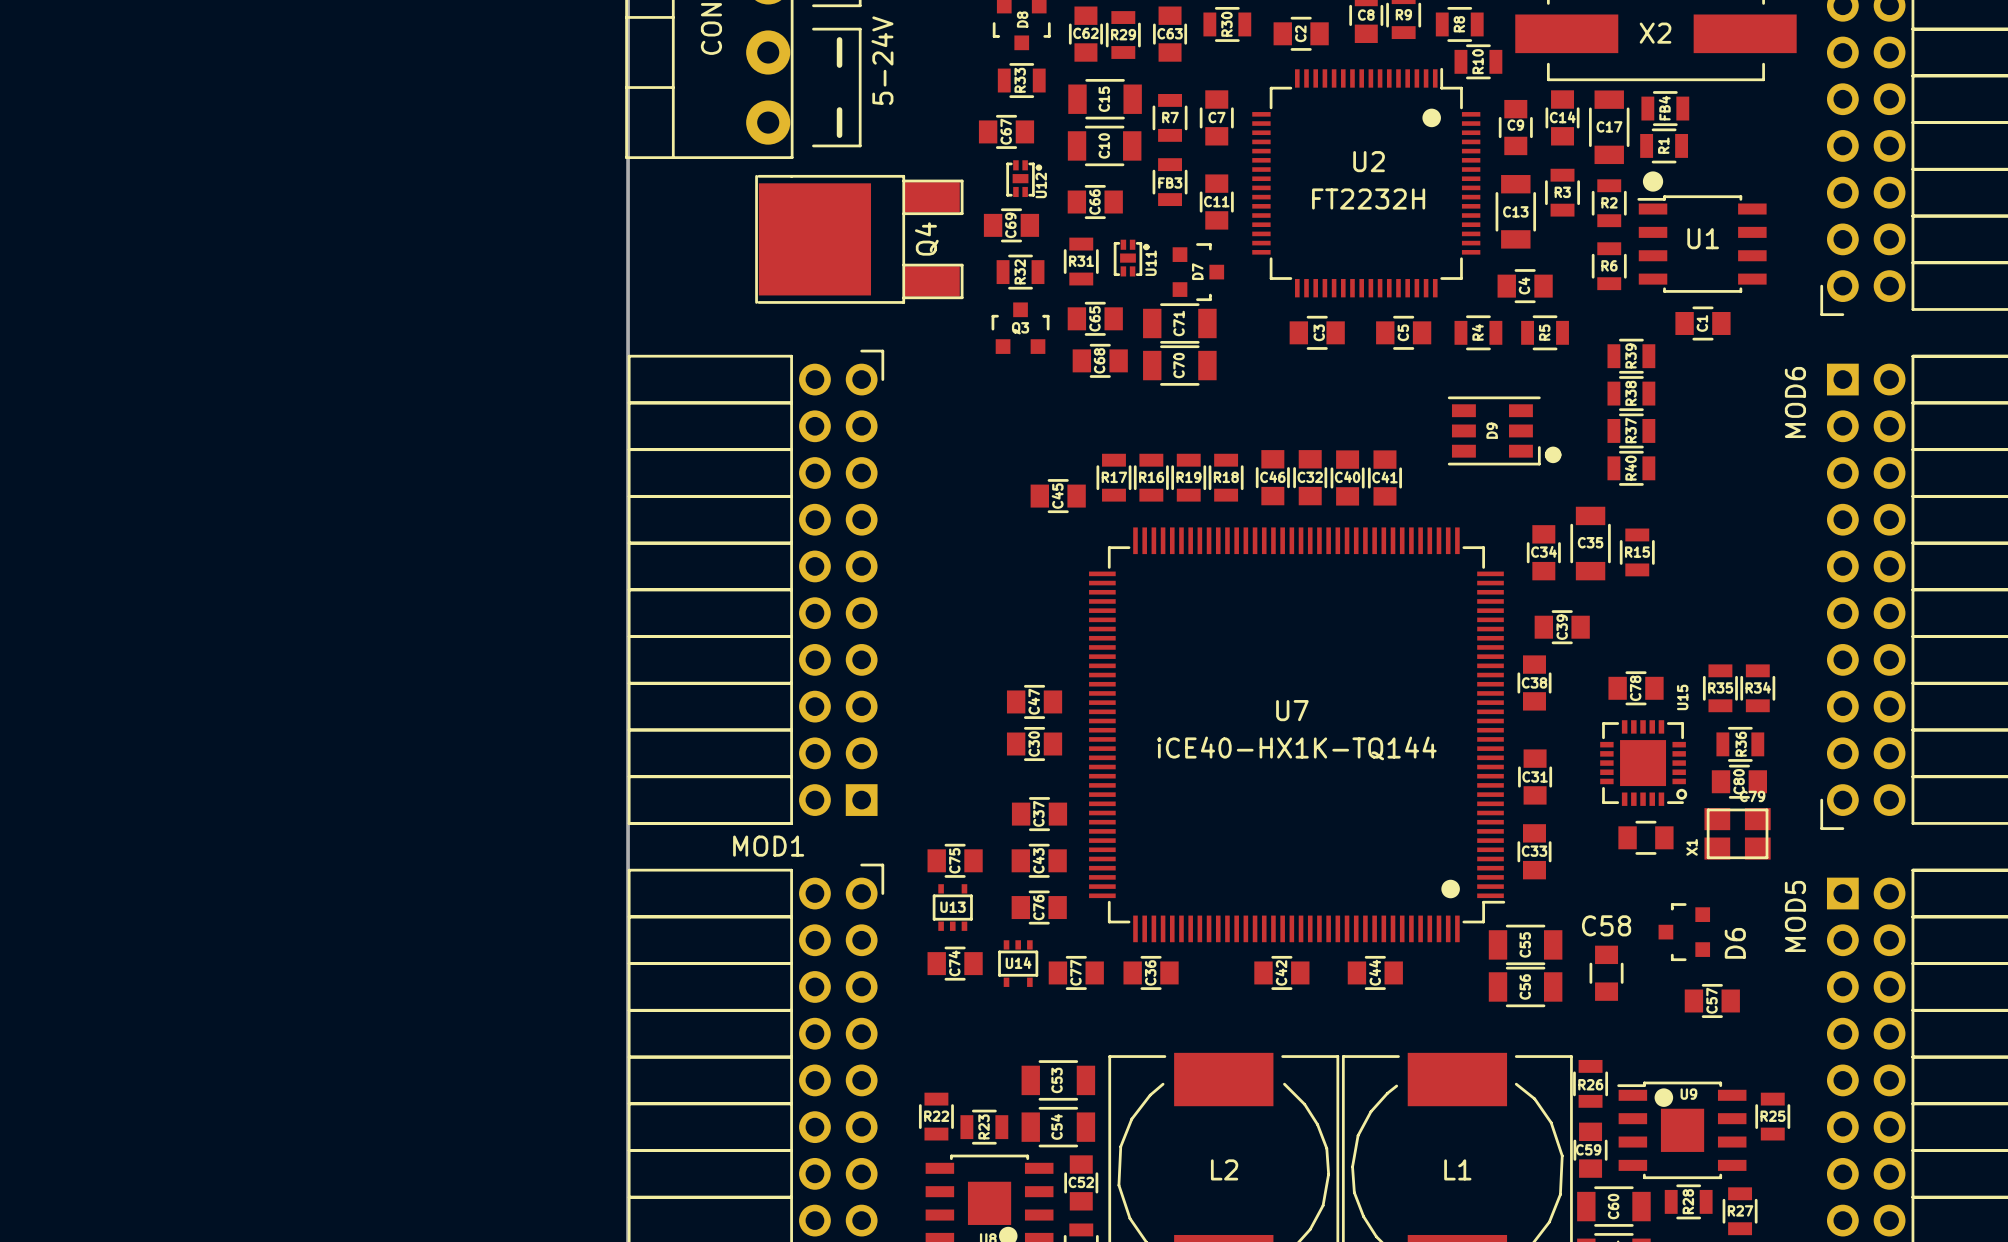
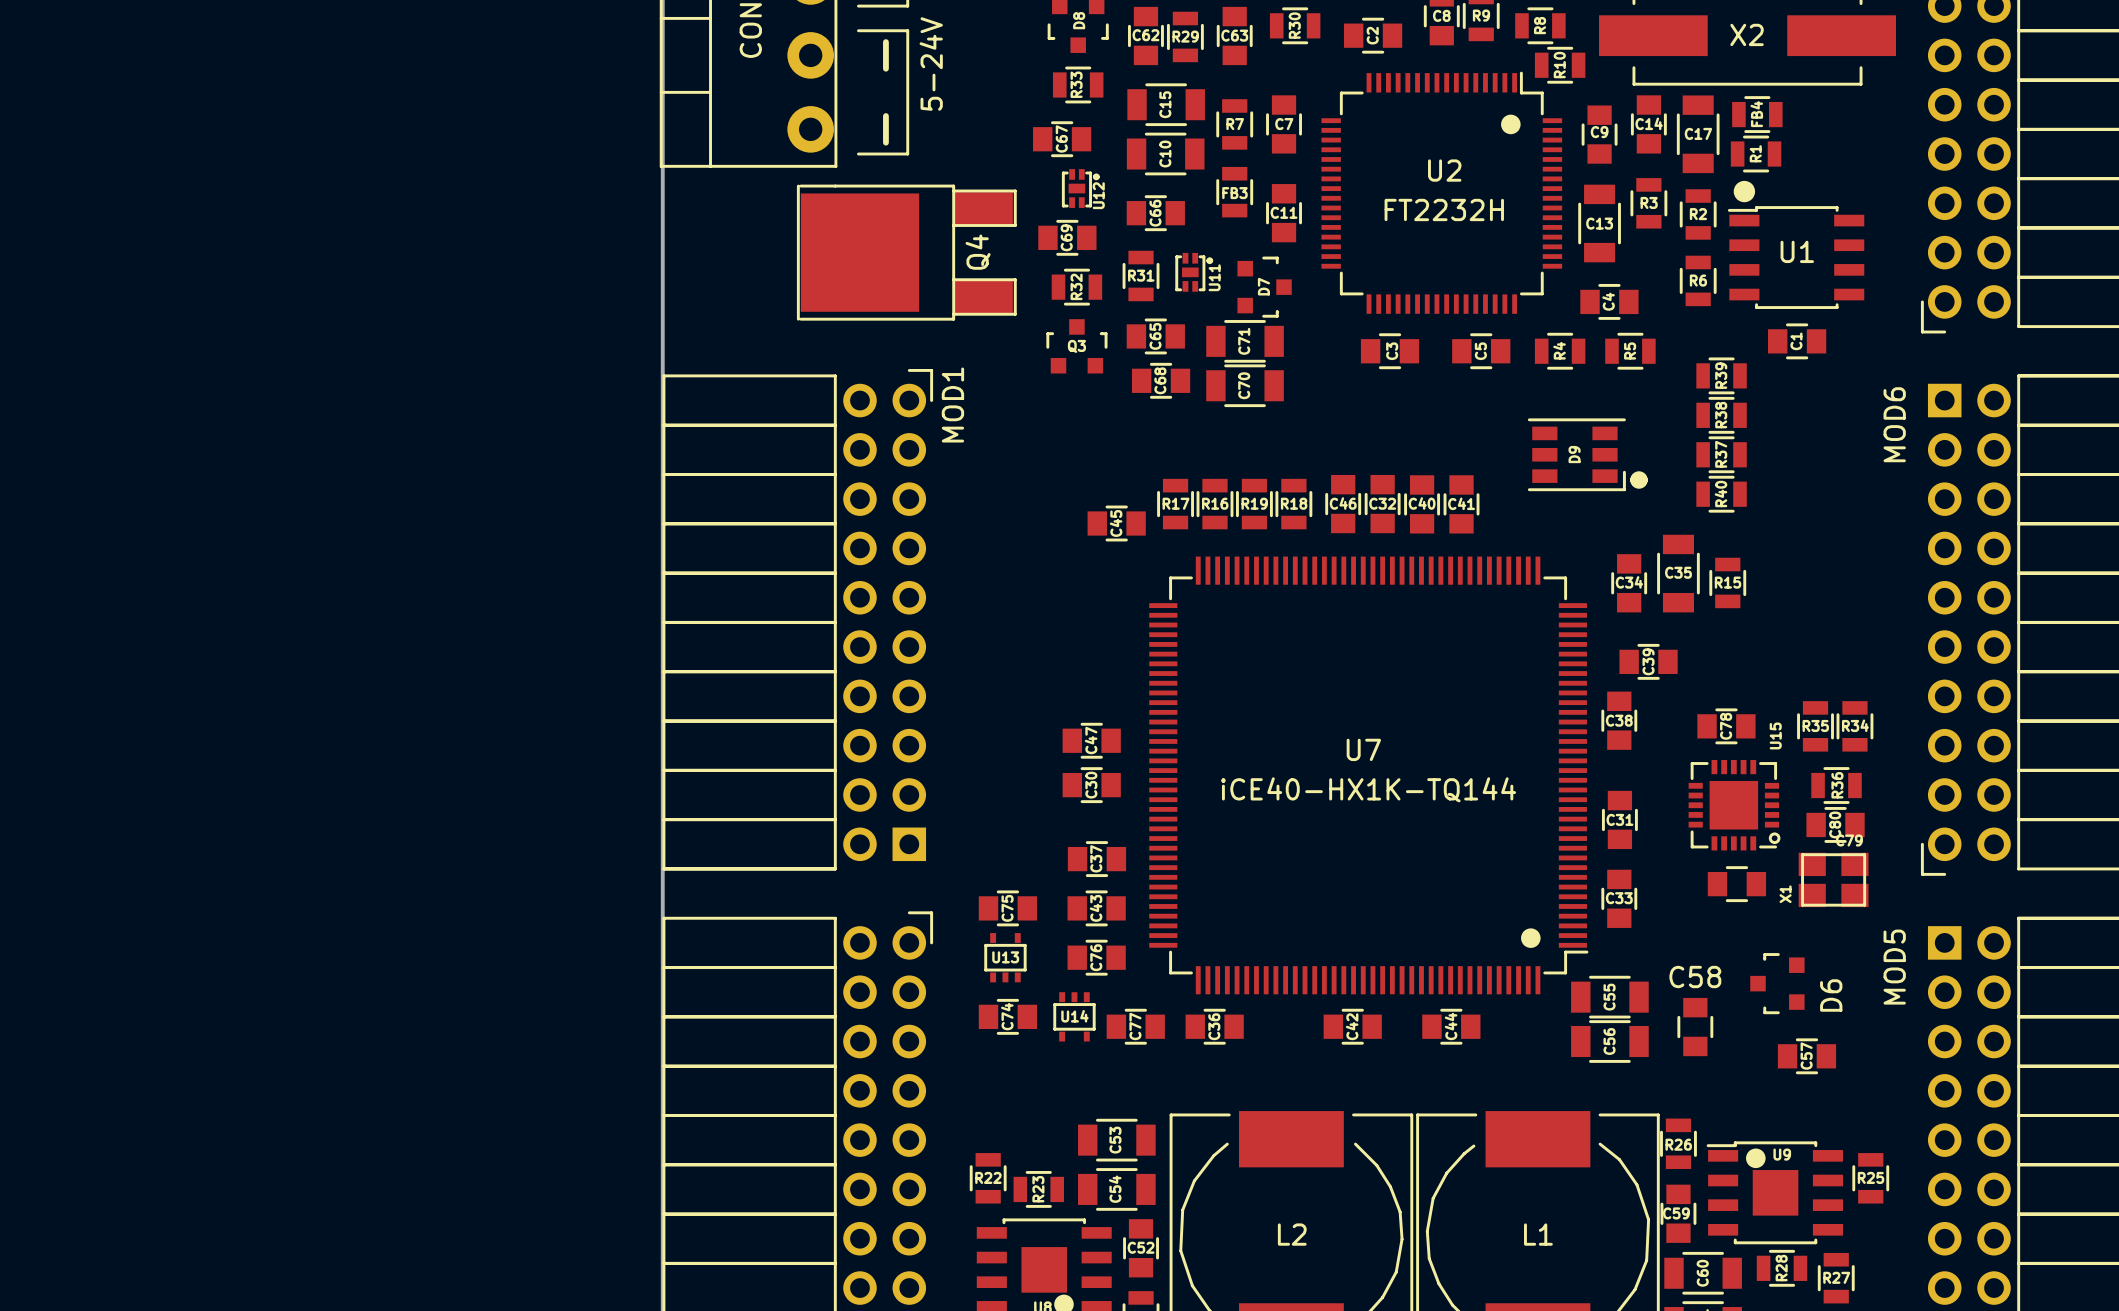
MOD1 name rotation: 0° (768, 846) -> 90° counterclockwise (952, 405)
MOD1 name position: MOD1 (768, 846) -> MOD1 (952, 405)

